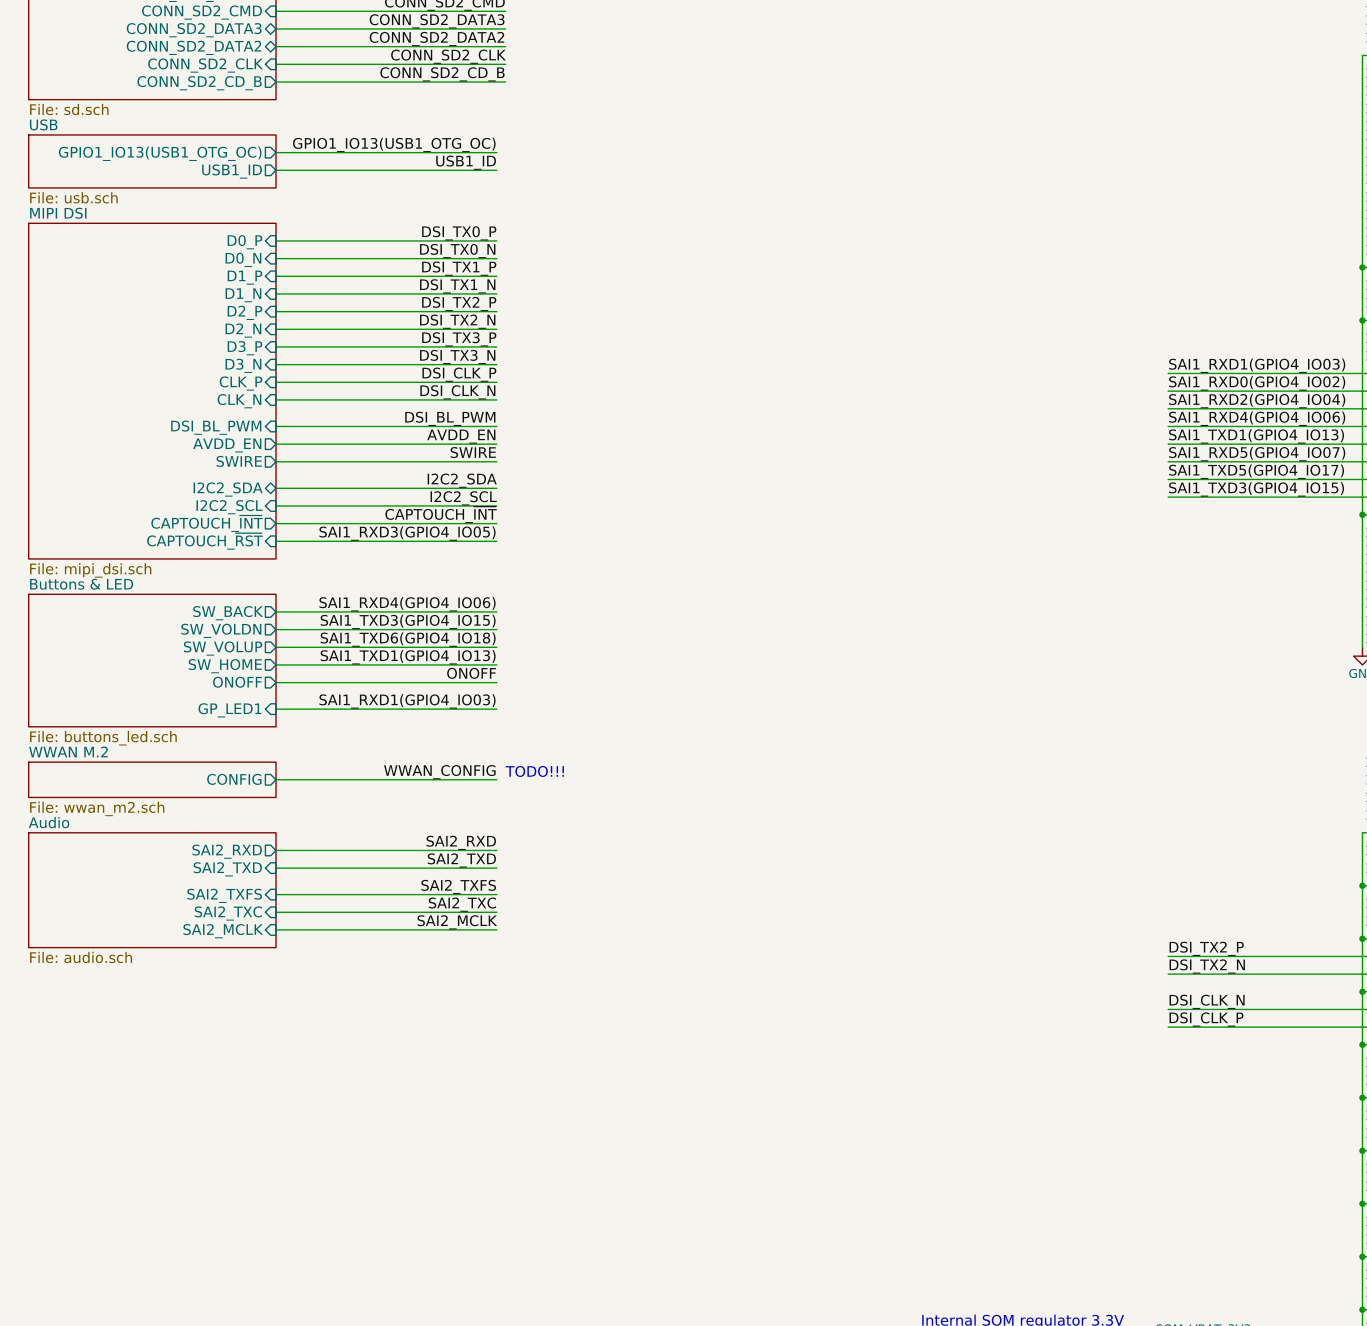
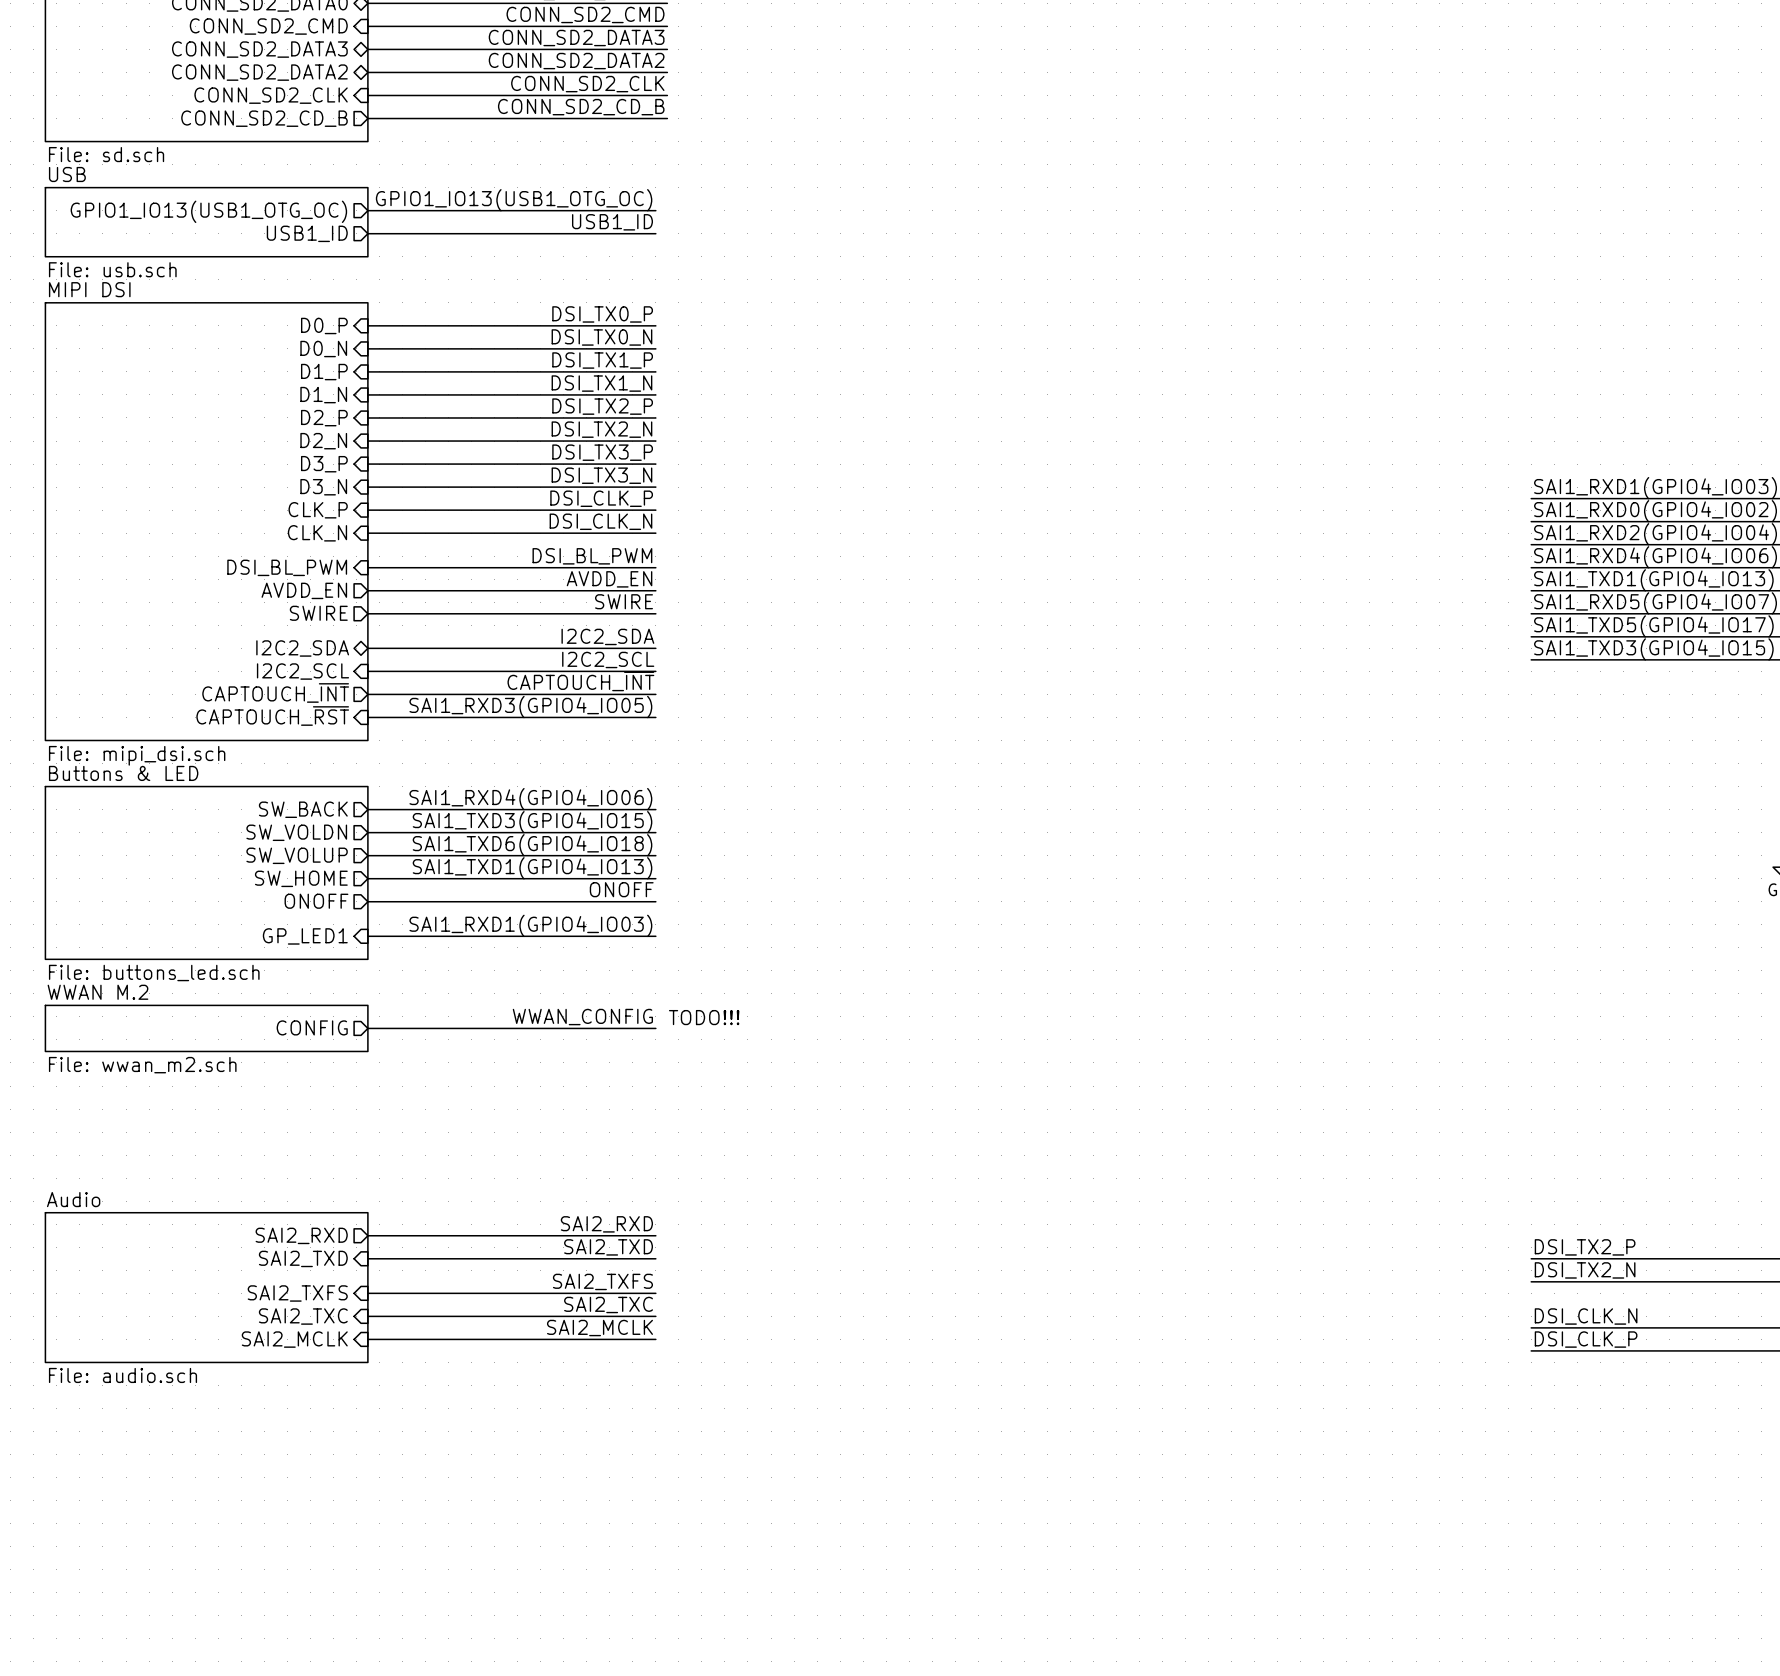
label position: SAI2_RXD (461, 842) -> SAI2_RXD (606, 1224)
wire: (276, 850) (496, 850) -> (367, 1235) (655, 1235)
sheet pin position: SAI2_RXD (227, 851) -> SAI2_RXD (301, 1235)
label position: SAI2_TXD (461, 860) -> SAI2_TXD (608, 1247)
wire: (276, 868) (496, 868) -> (367, 1258) (655, 1258)
sheet pin position: SAI2_TXD (227, 869) -> SAI2_TXD (303, 1258)
label position: SAI2_TXFS (458, 886) -> SAI2_TXFS (602, 1281)
sheet Audio position: (152, 890) -> (206, 1287)
wire: (276, 894) (496, 894) -> (367, 1293) (655, 1293)
sheet pin position: SAI2_TXFS (224, 895) -> SAI2_TXFS (297, 1293)
label position: SAI2_TXC (462, 904) -> SAI2_TXC (608, 1304)
wire: (276, 912) (496, 912) -> (367, 1316) (655, 1316)
sheet pin position: SAI2_TXC (228, 913) -> SAI2_TXC (303, 1316)
label position: SAI2_MCLK (457, 922) -> SAI2_MCLK (599, 1328)
wire: (276, 929) (496, 929) -> (367, 1339) (655, 1339)
sheet pin position: SAI2_MCLK (223, 931) -> SAI2_MCLK (294, 1339)

